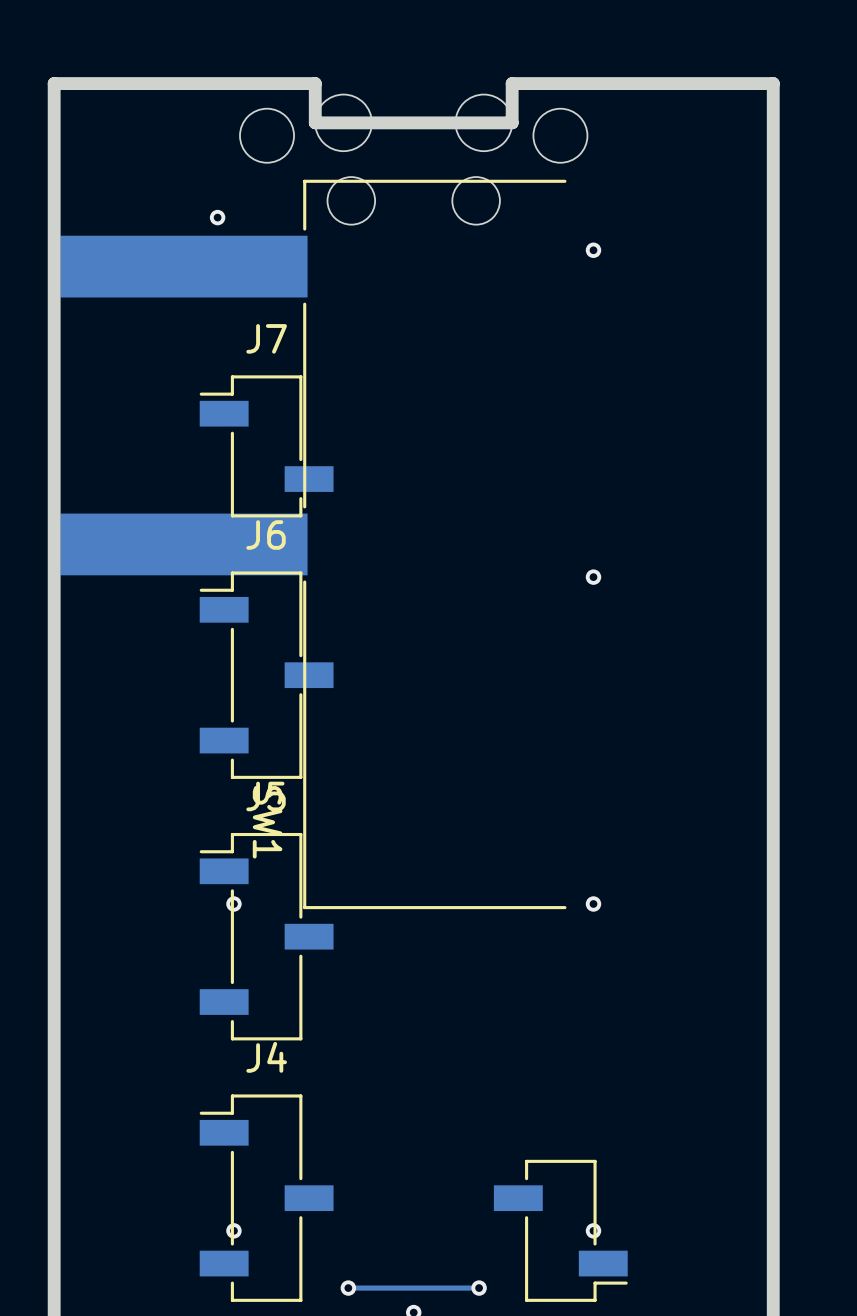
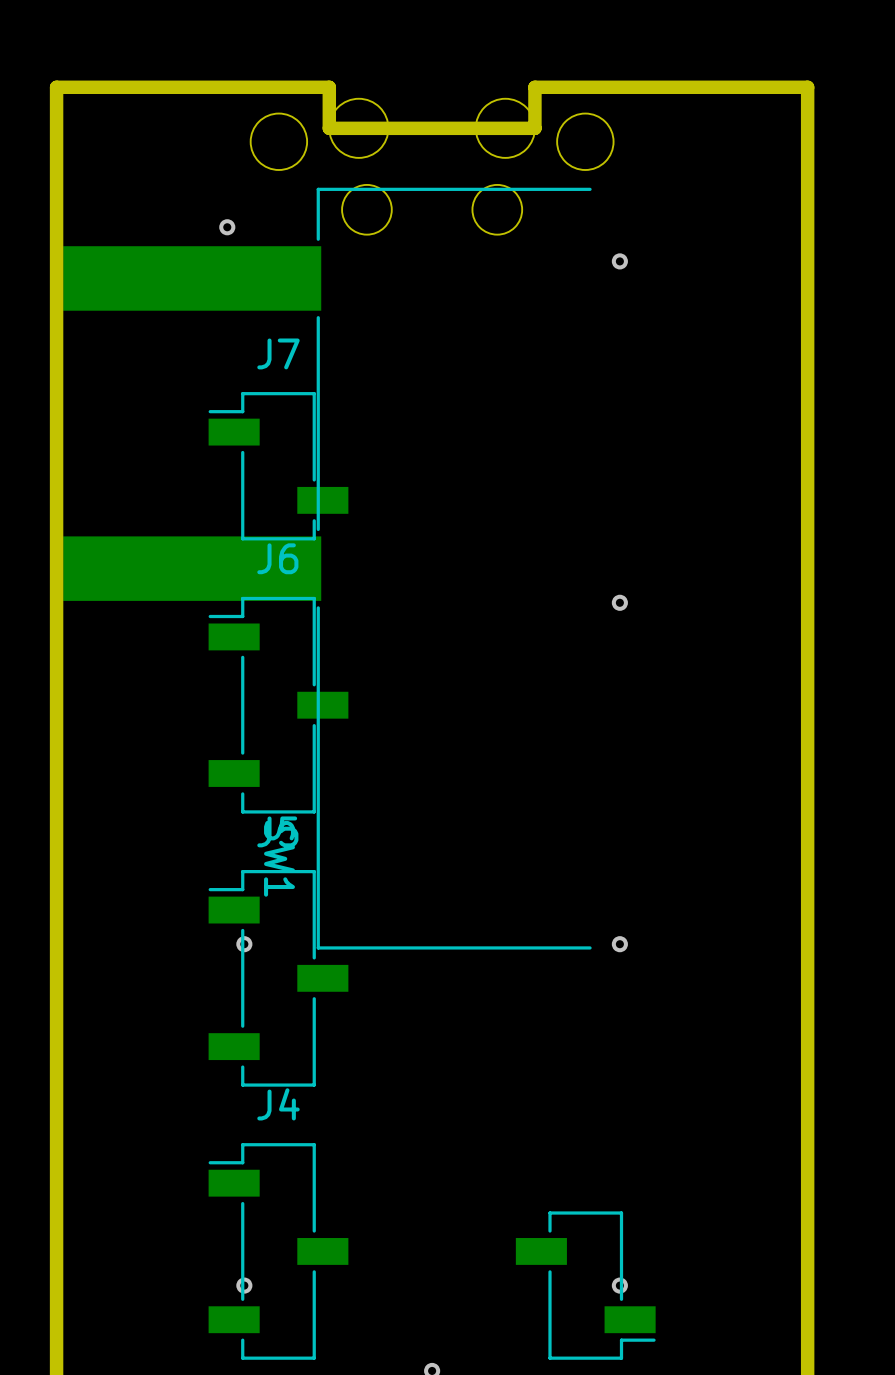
via: (348, 1288) -> none
track: (479, 1288) (348, 1288) -> none
via: (479, 1288) -> none

